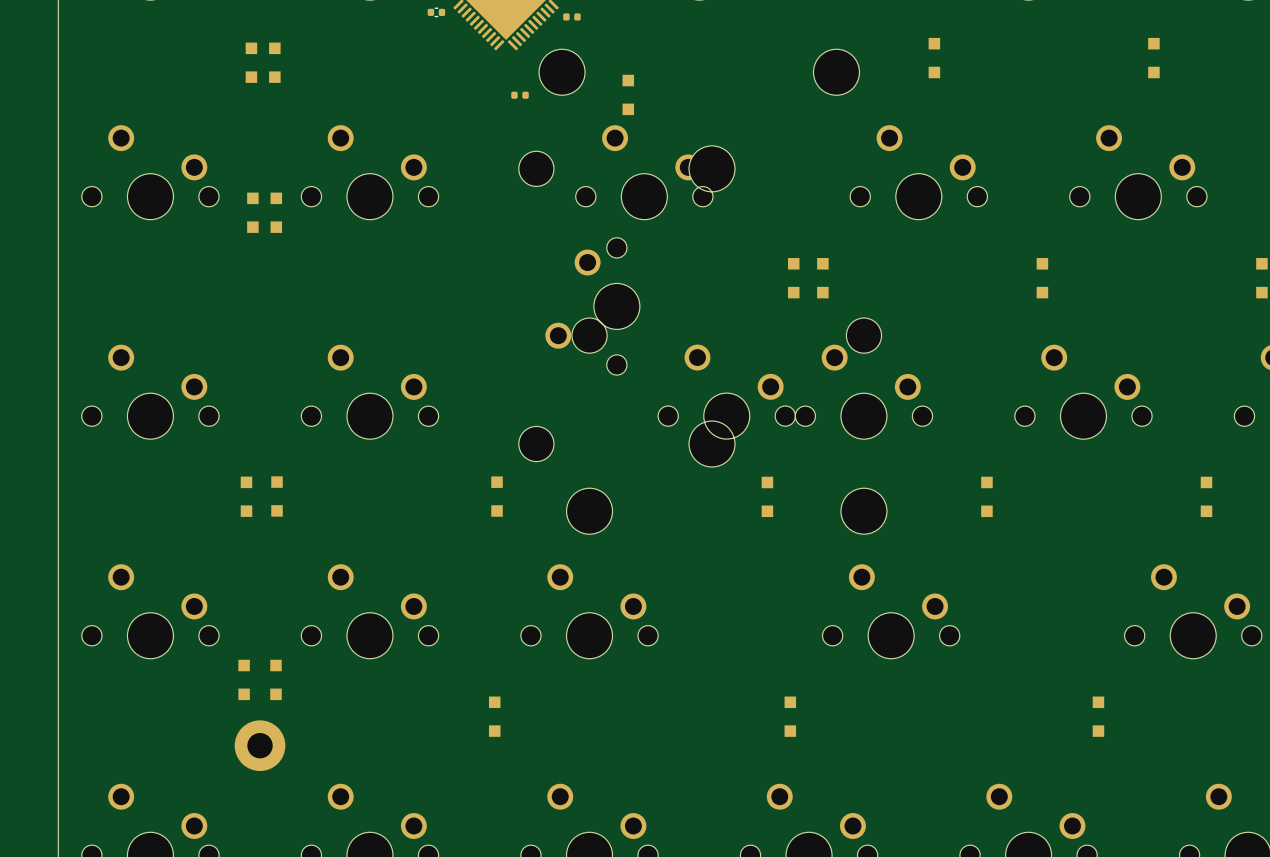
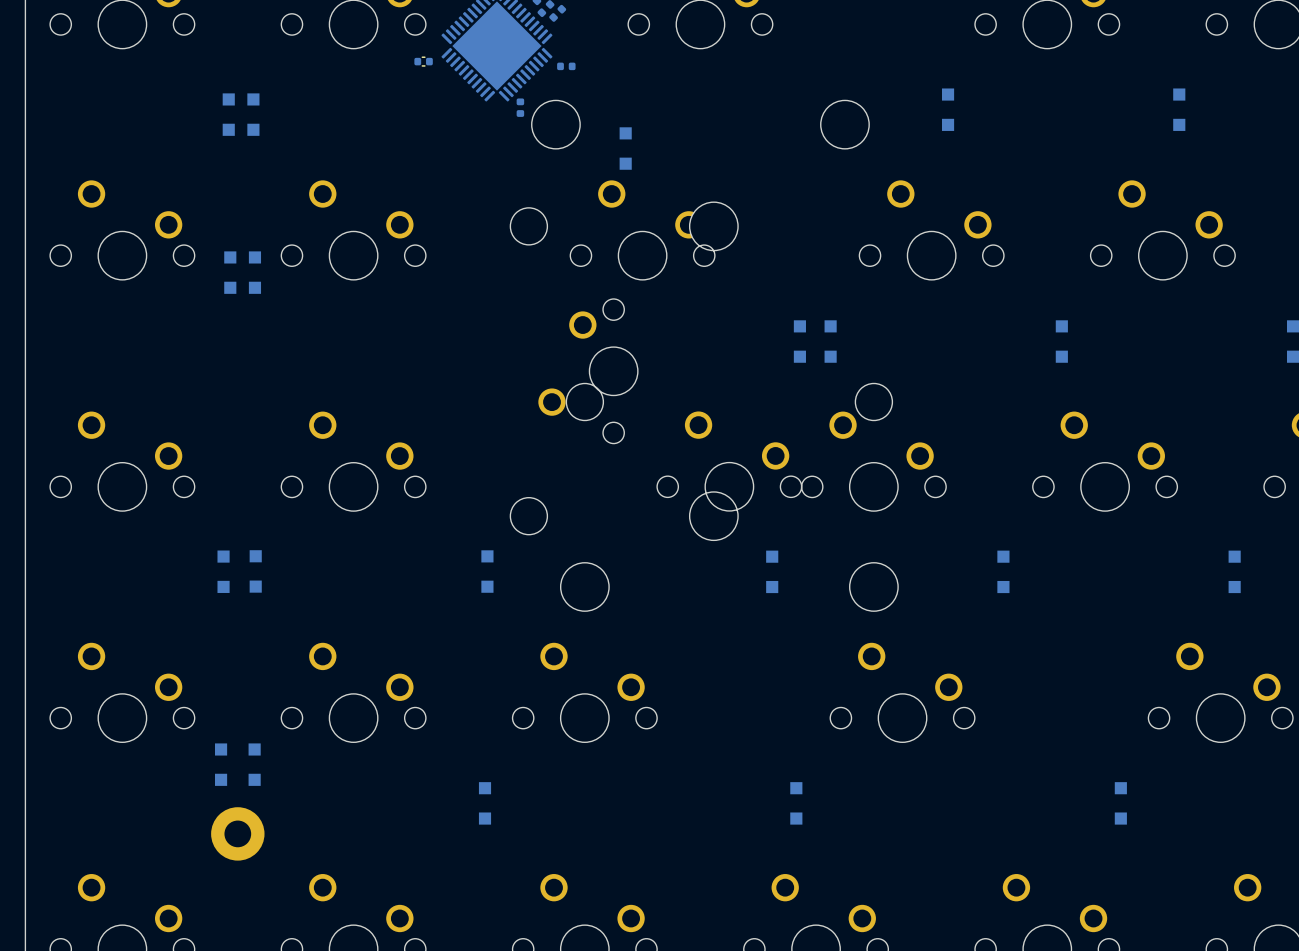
part rotation: 0° (519, 95) -> 90° clockwise (520, 107)
part position: (519, 95) -> (520, 107)

